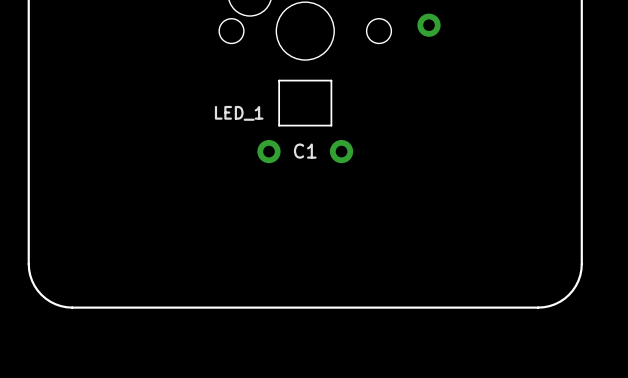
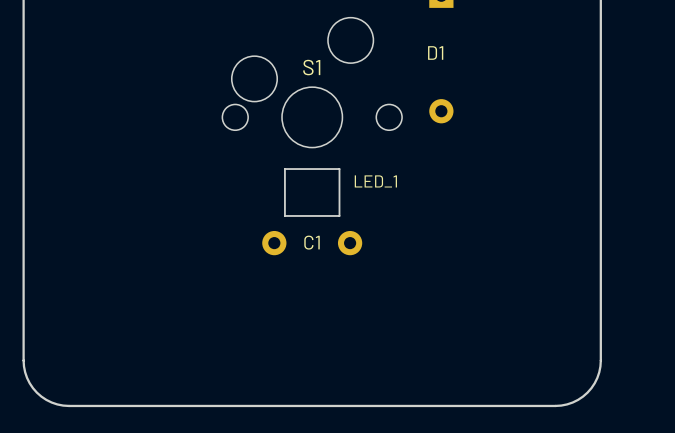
text position: LED_1 (239, 113) -> LED_1 (375, 181)

